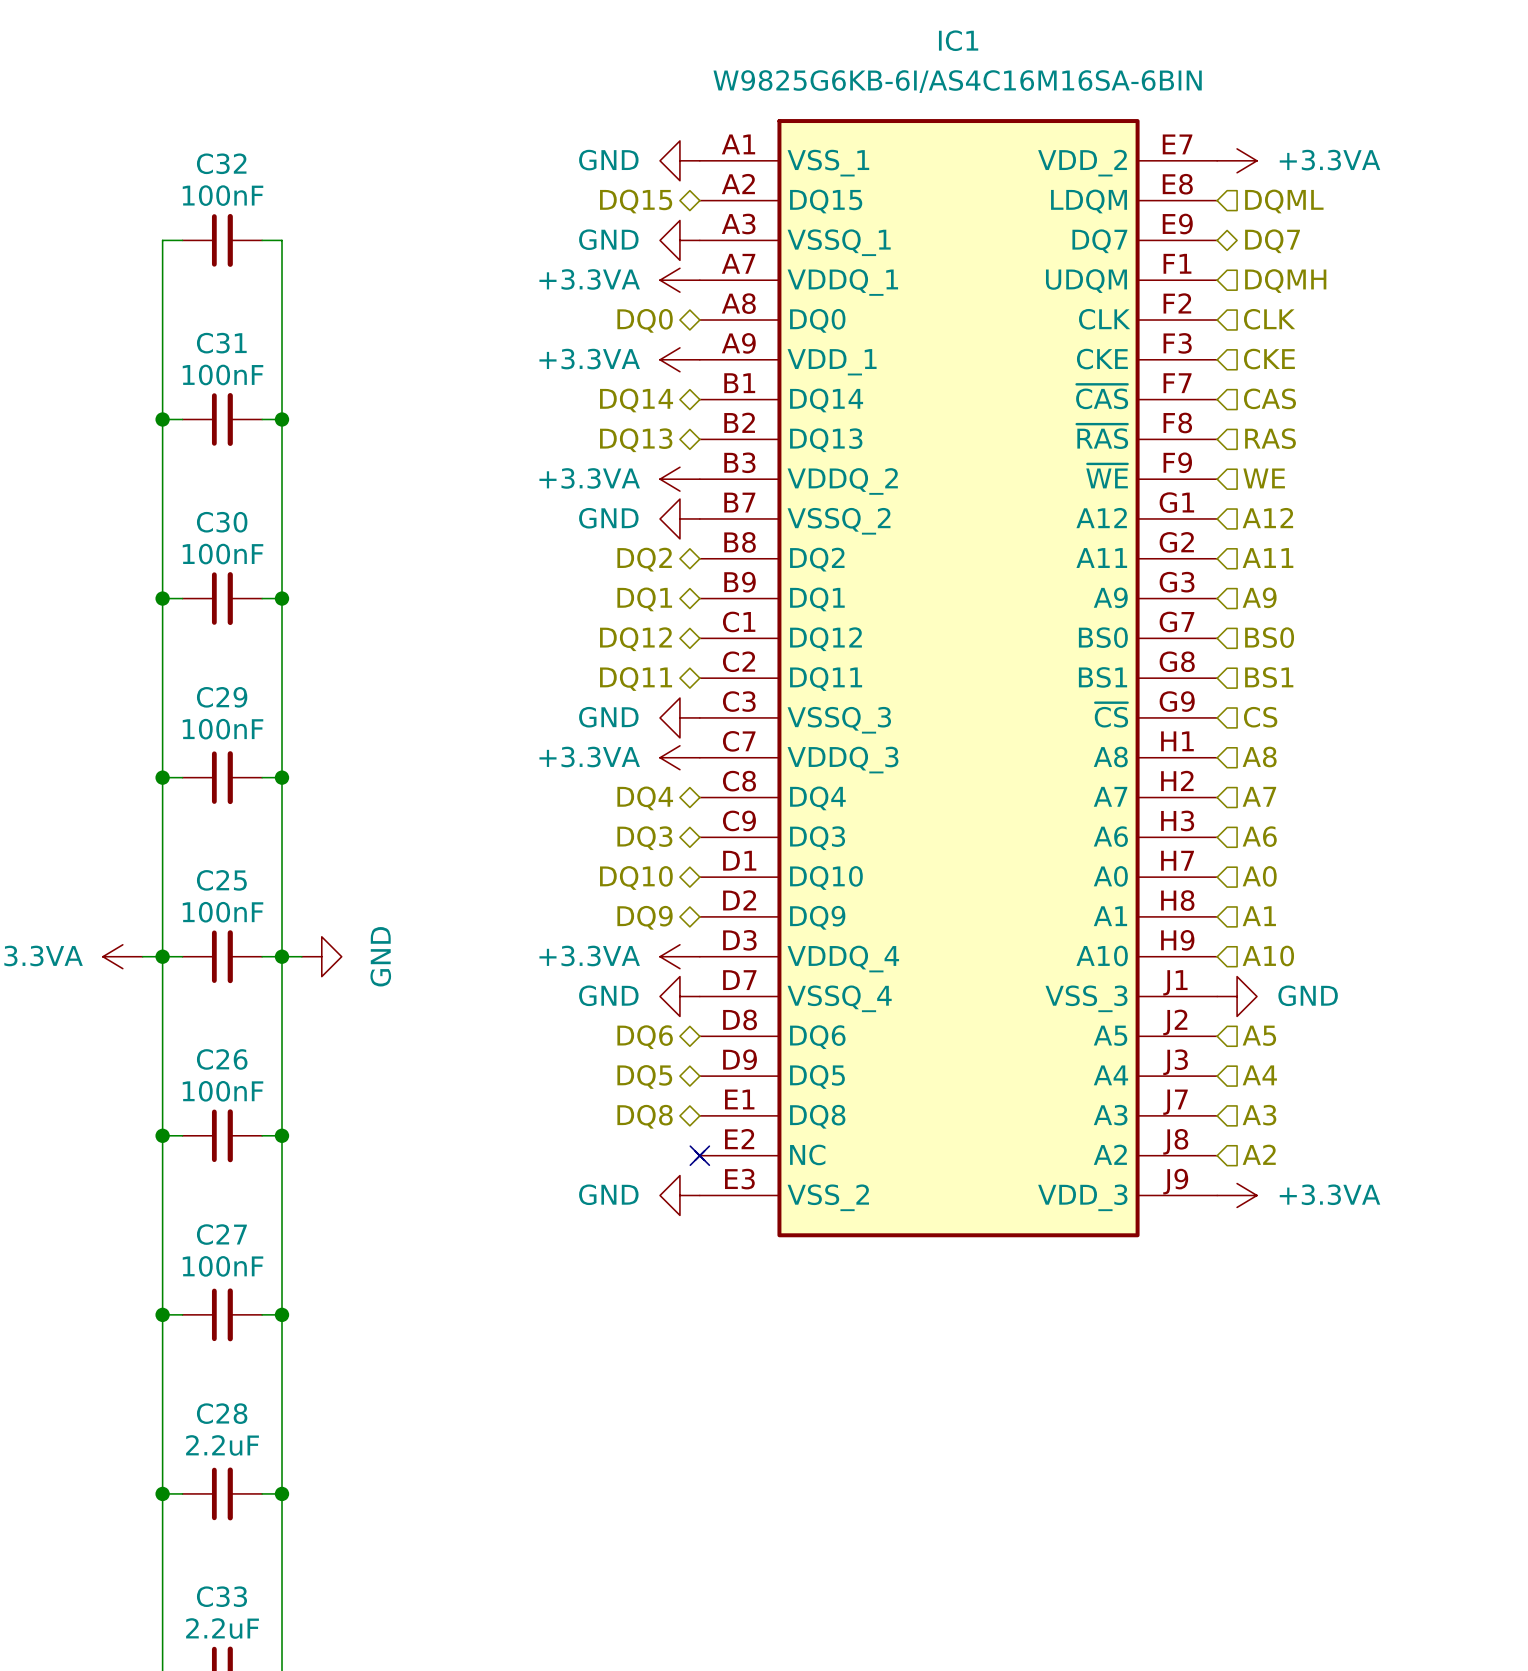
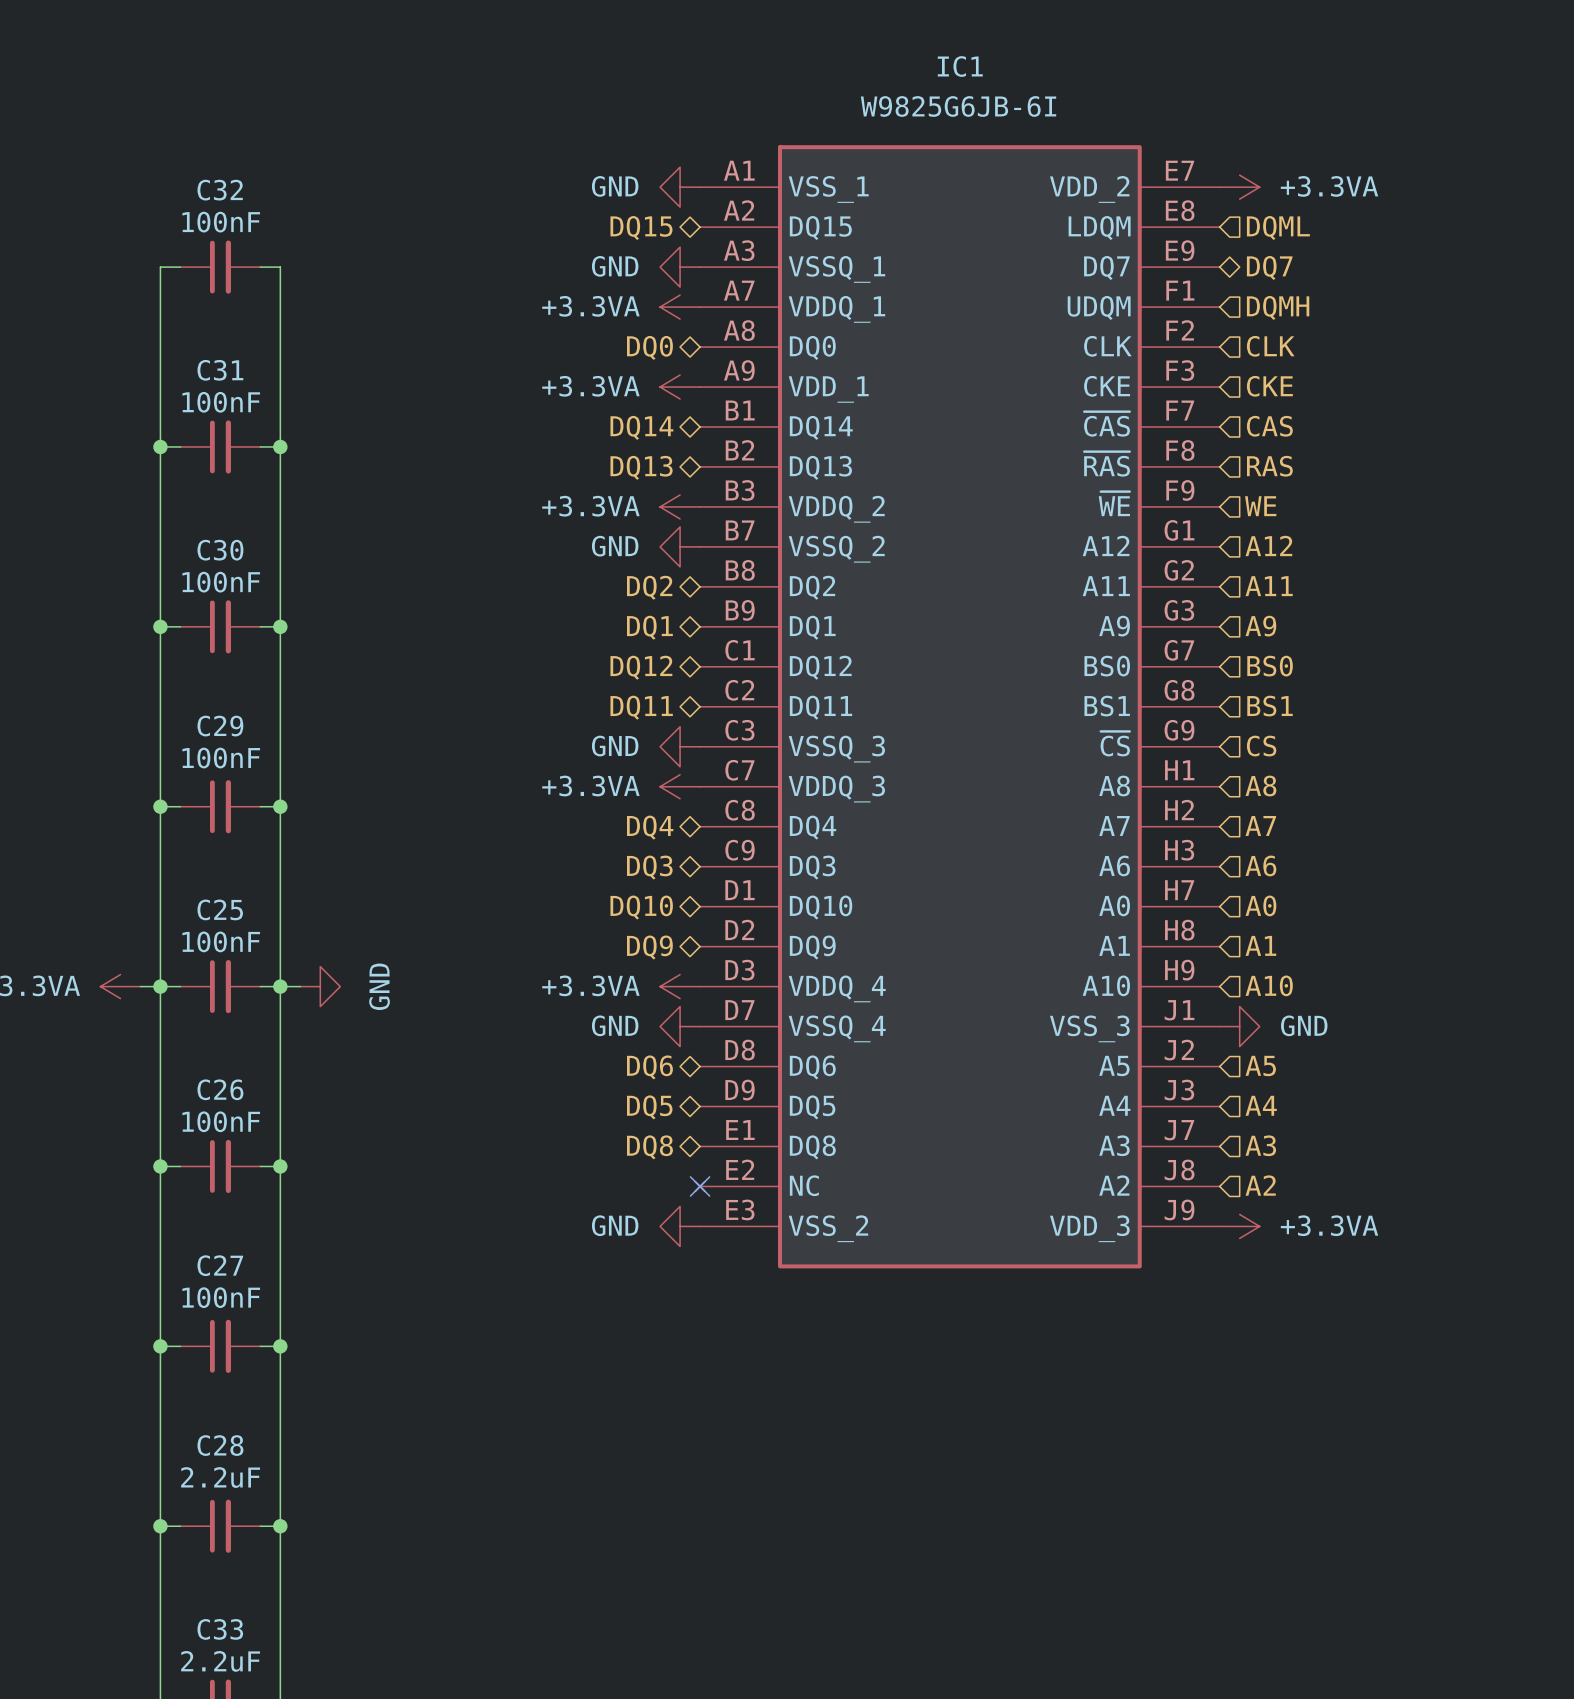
IC1 value: W9825G6KB-6I/AS4C16M16SA-6BIN (957, 81) -> W9825G6JB-6I (958, 106)

